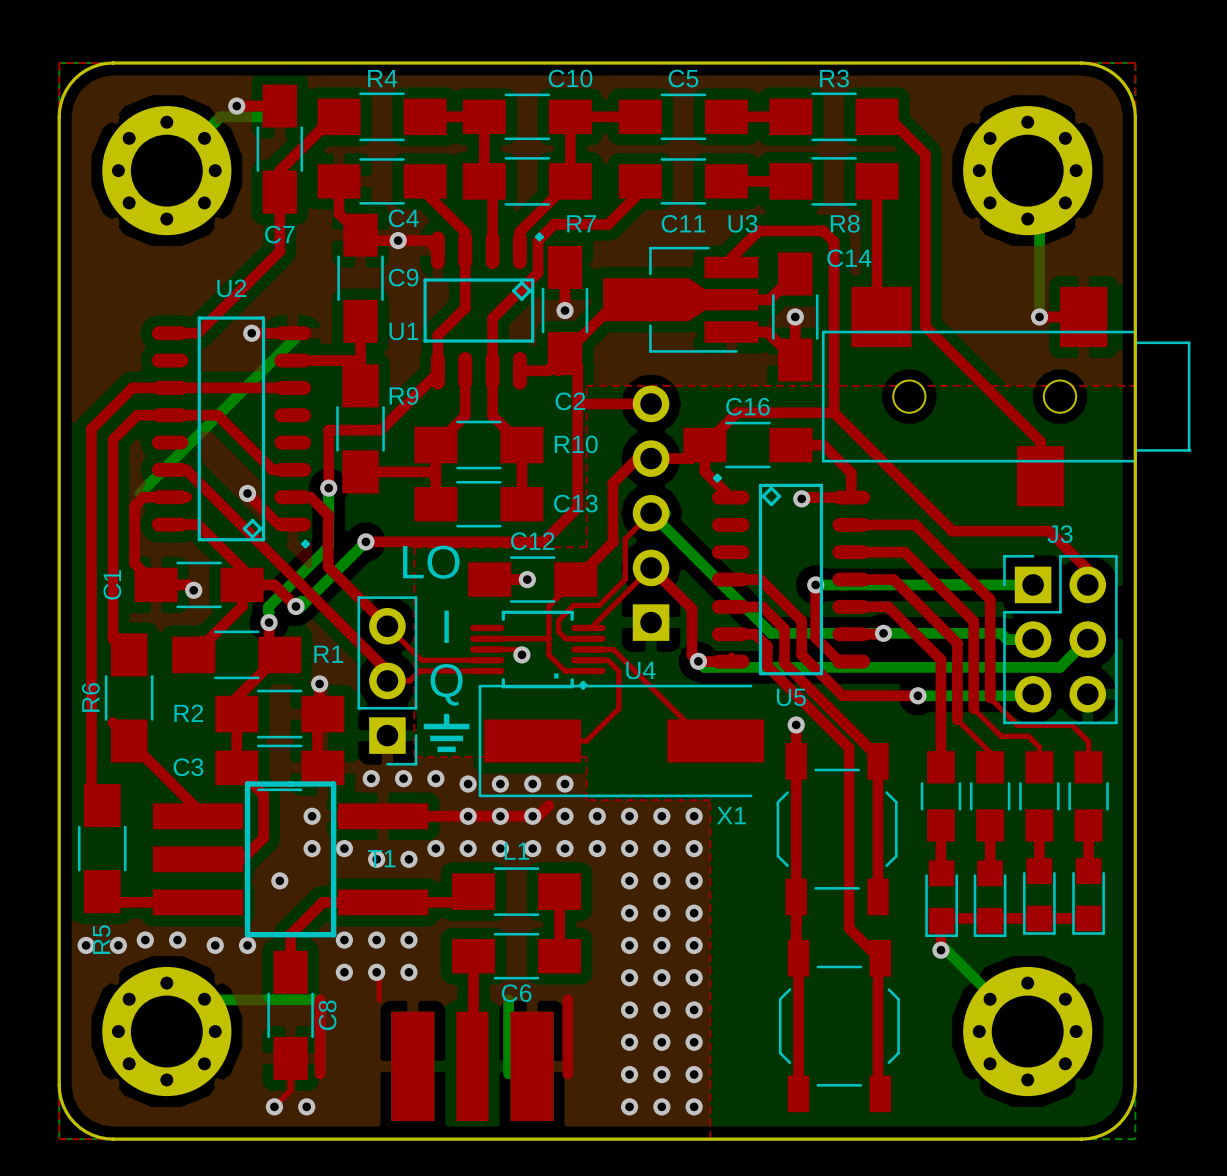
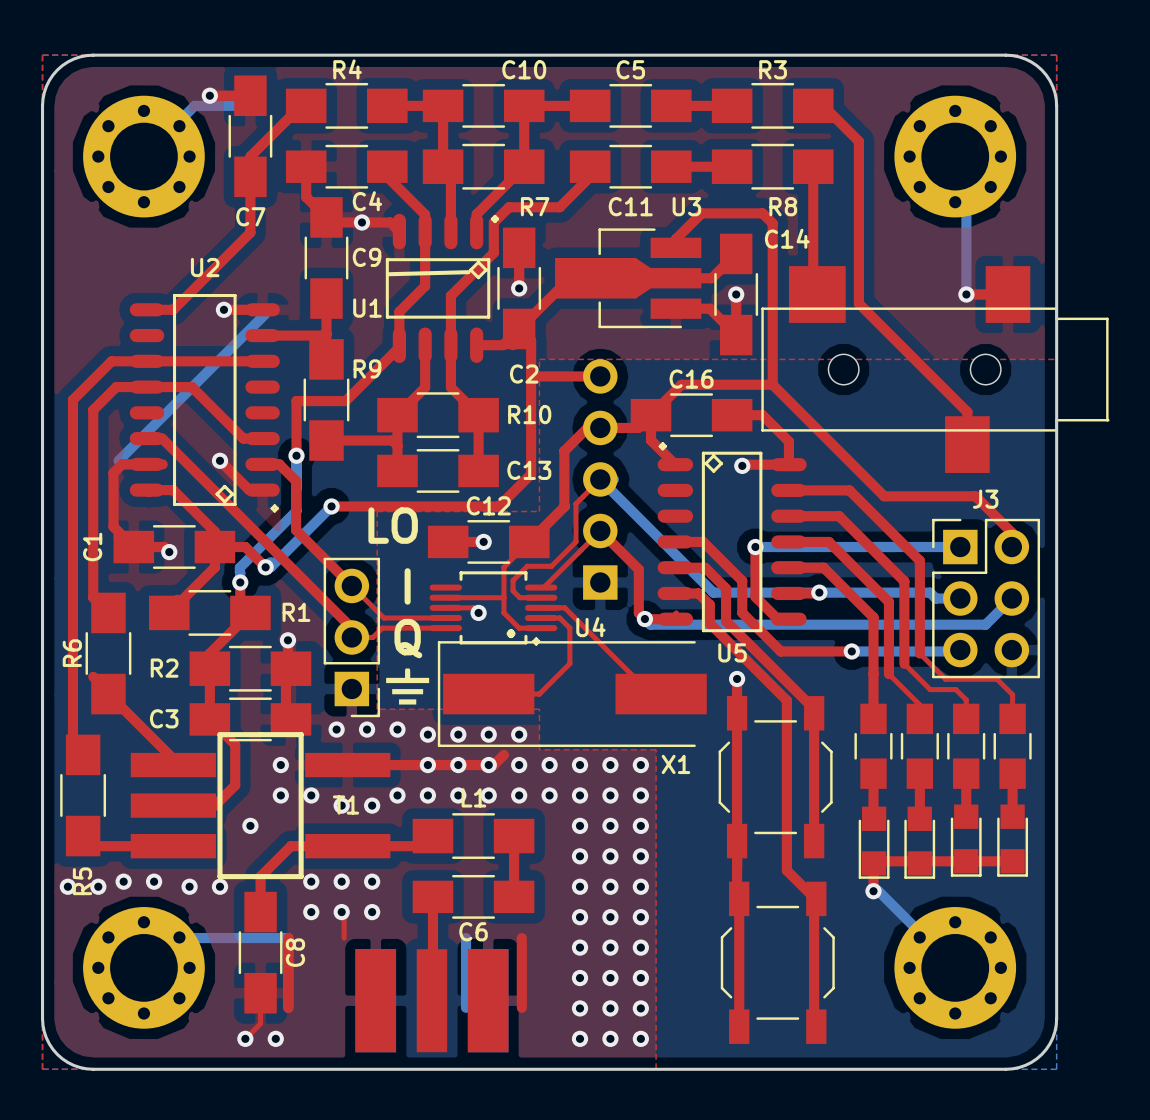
line: none -> (468, 272) (389, 274)

